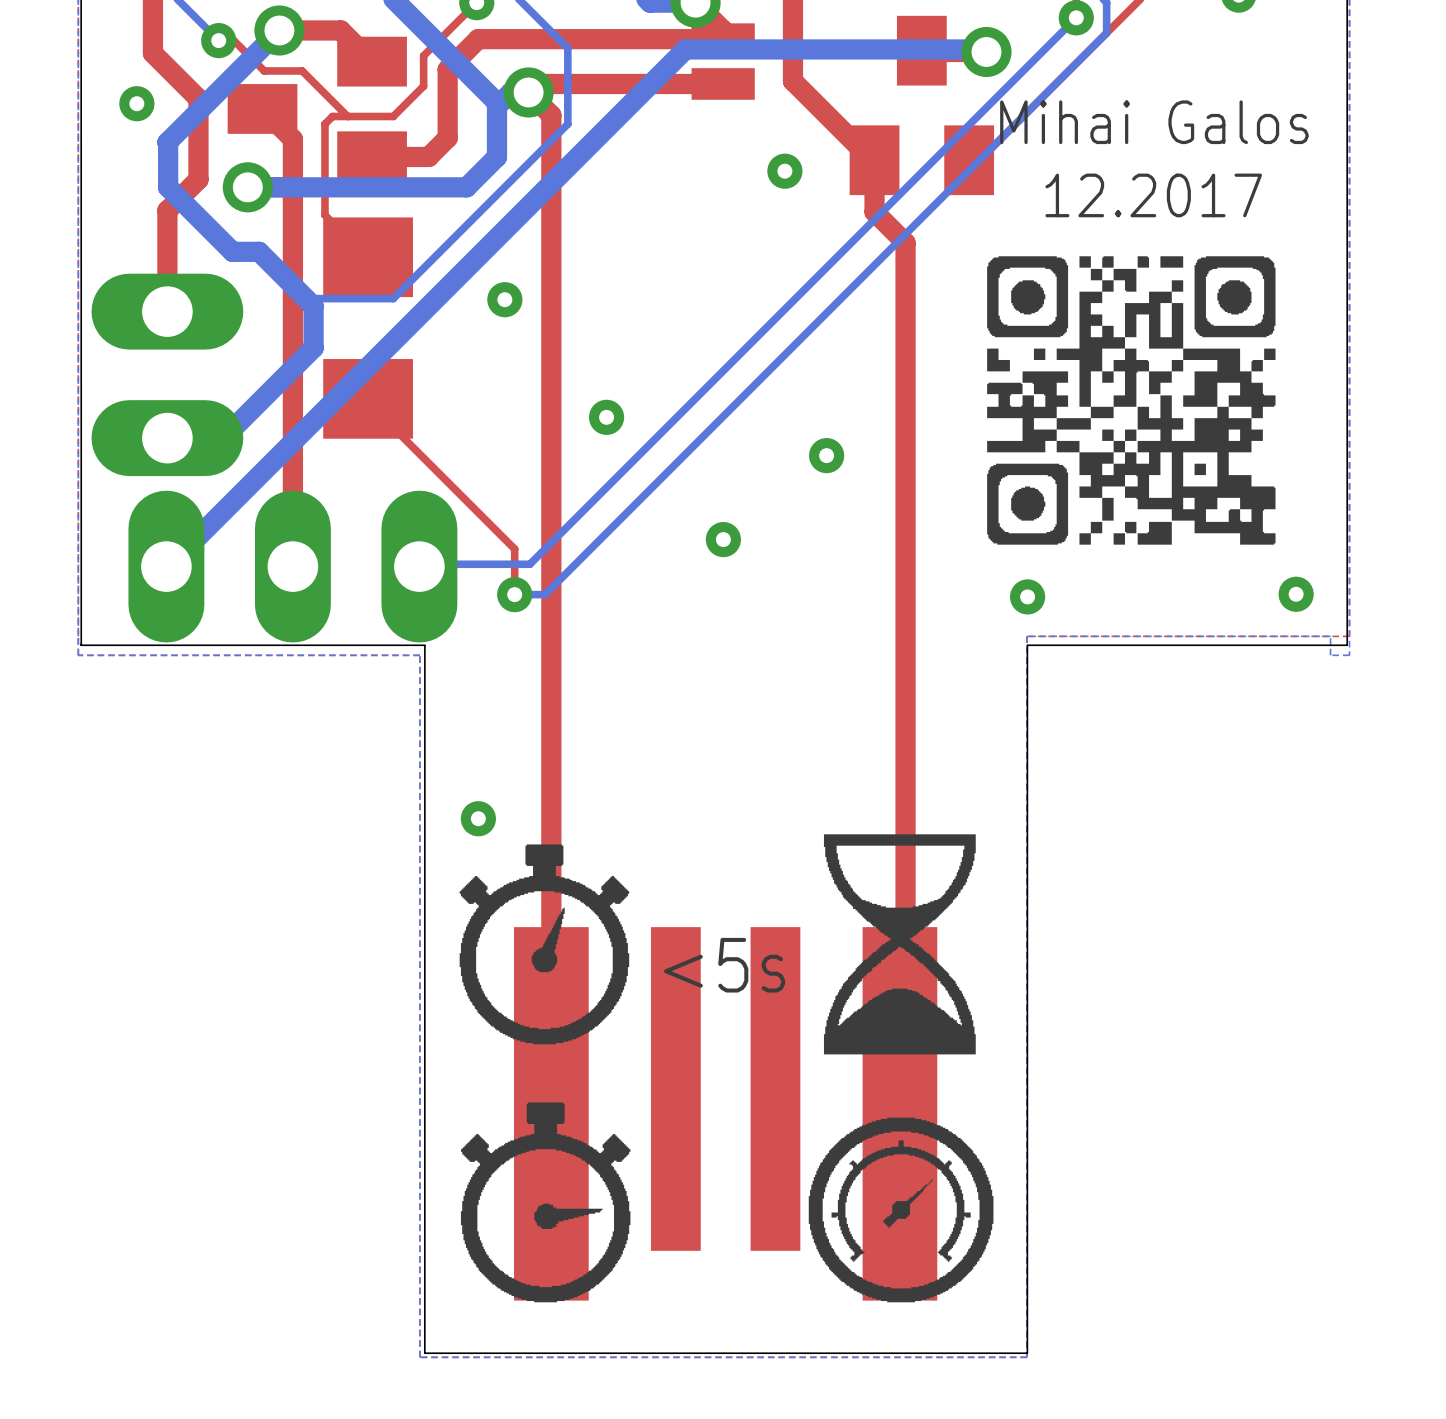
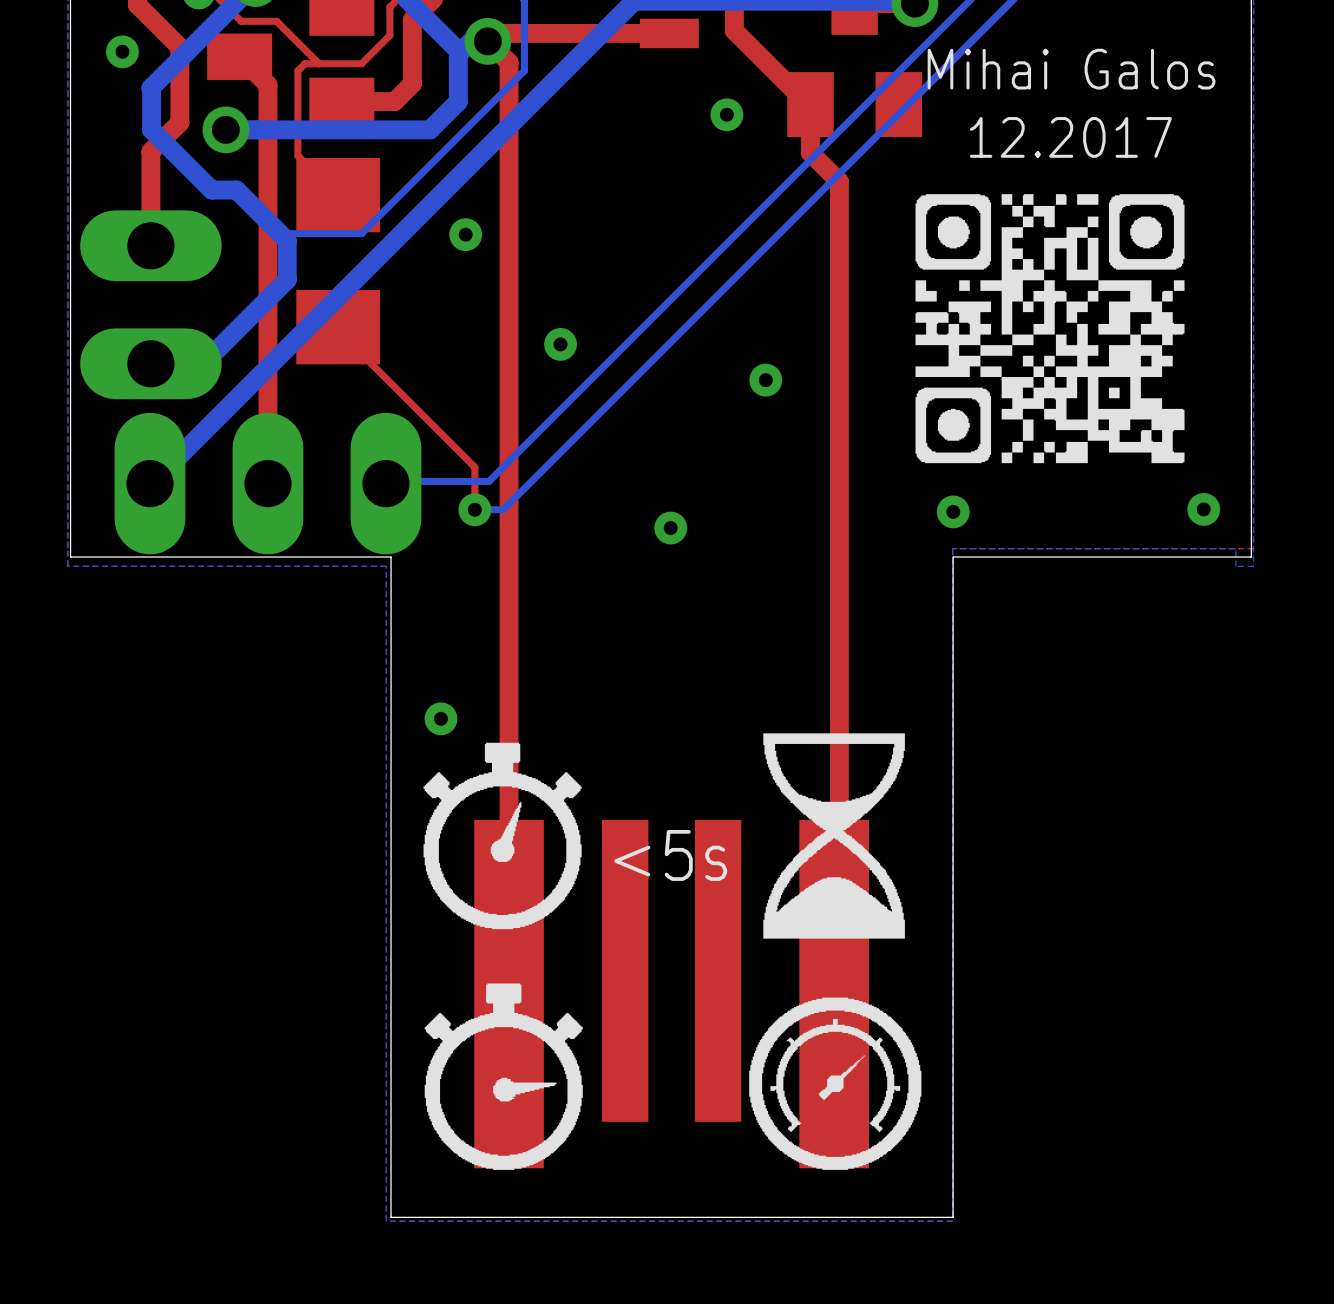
via position: (723, 539) -> (670, 528)

